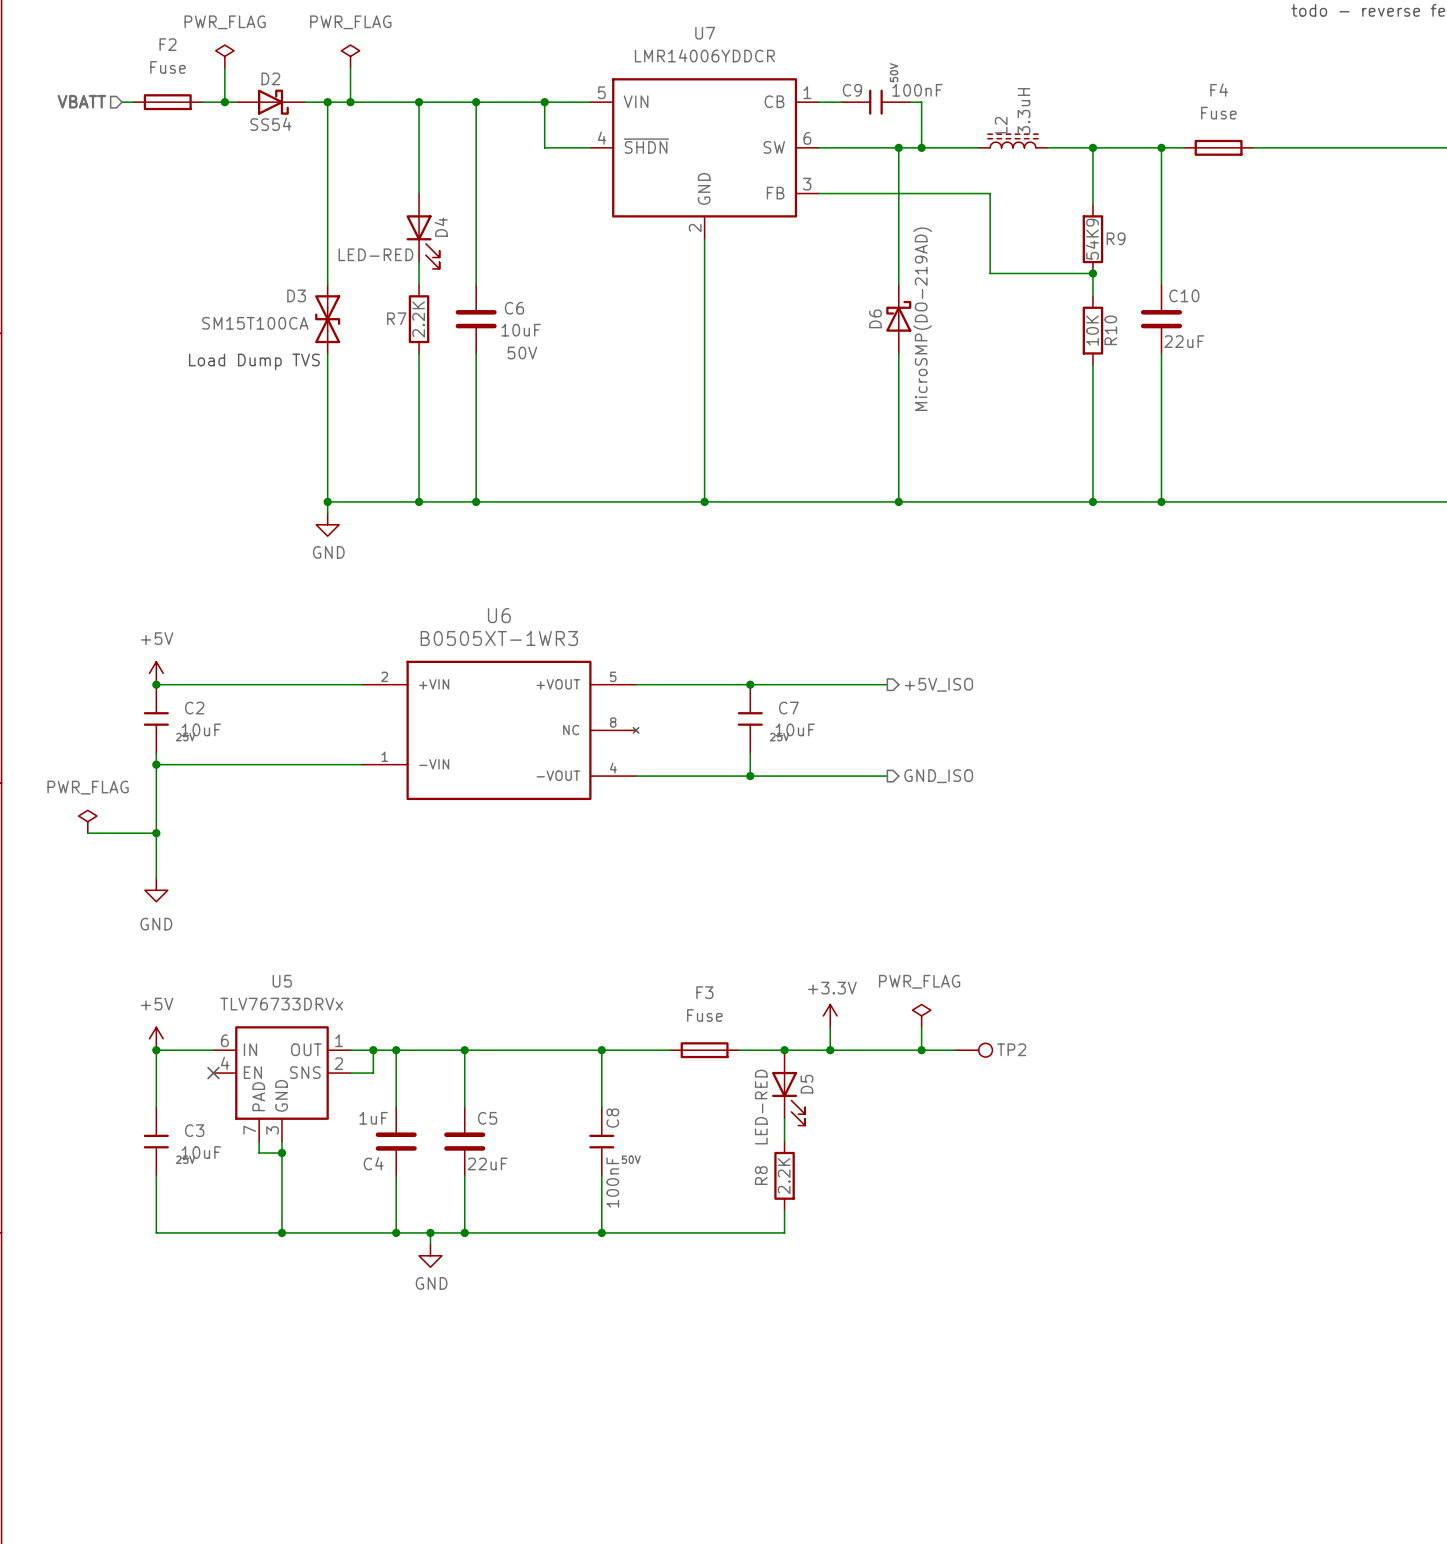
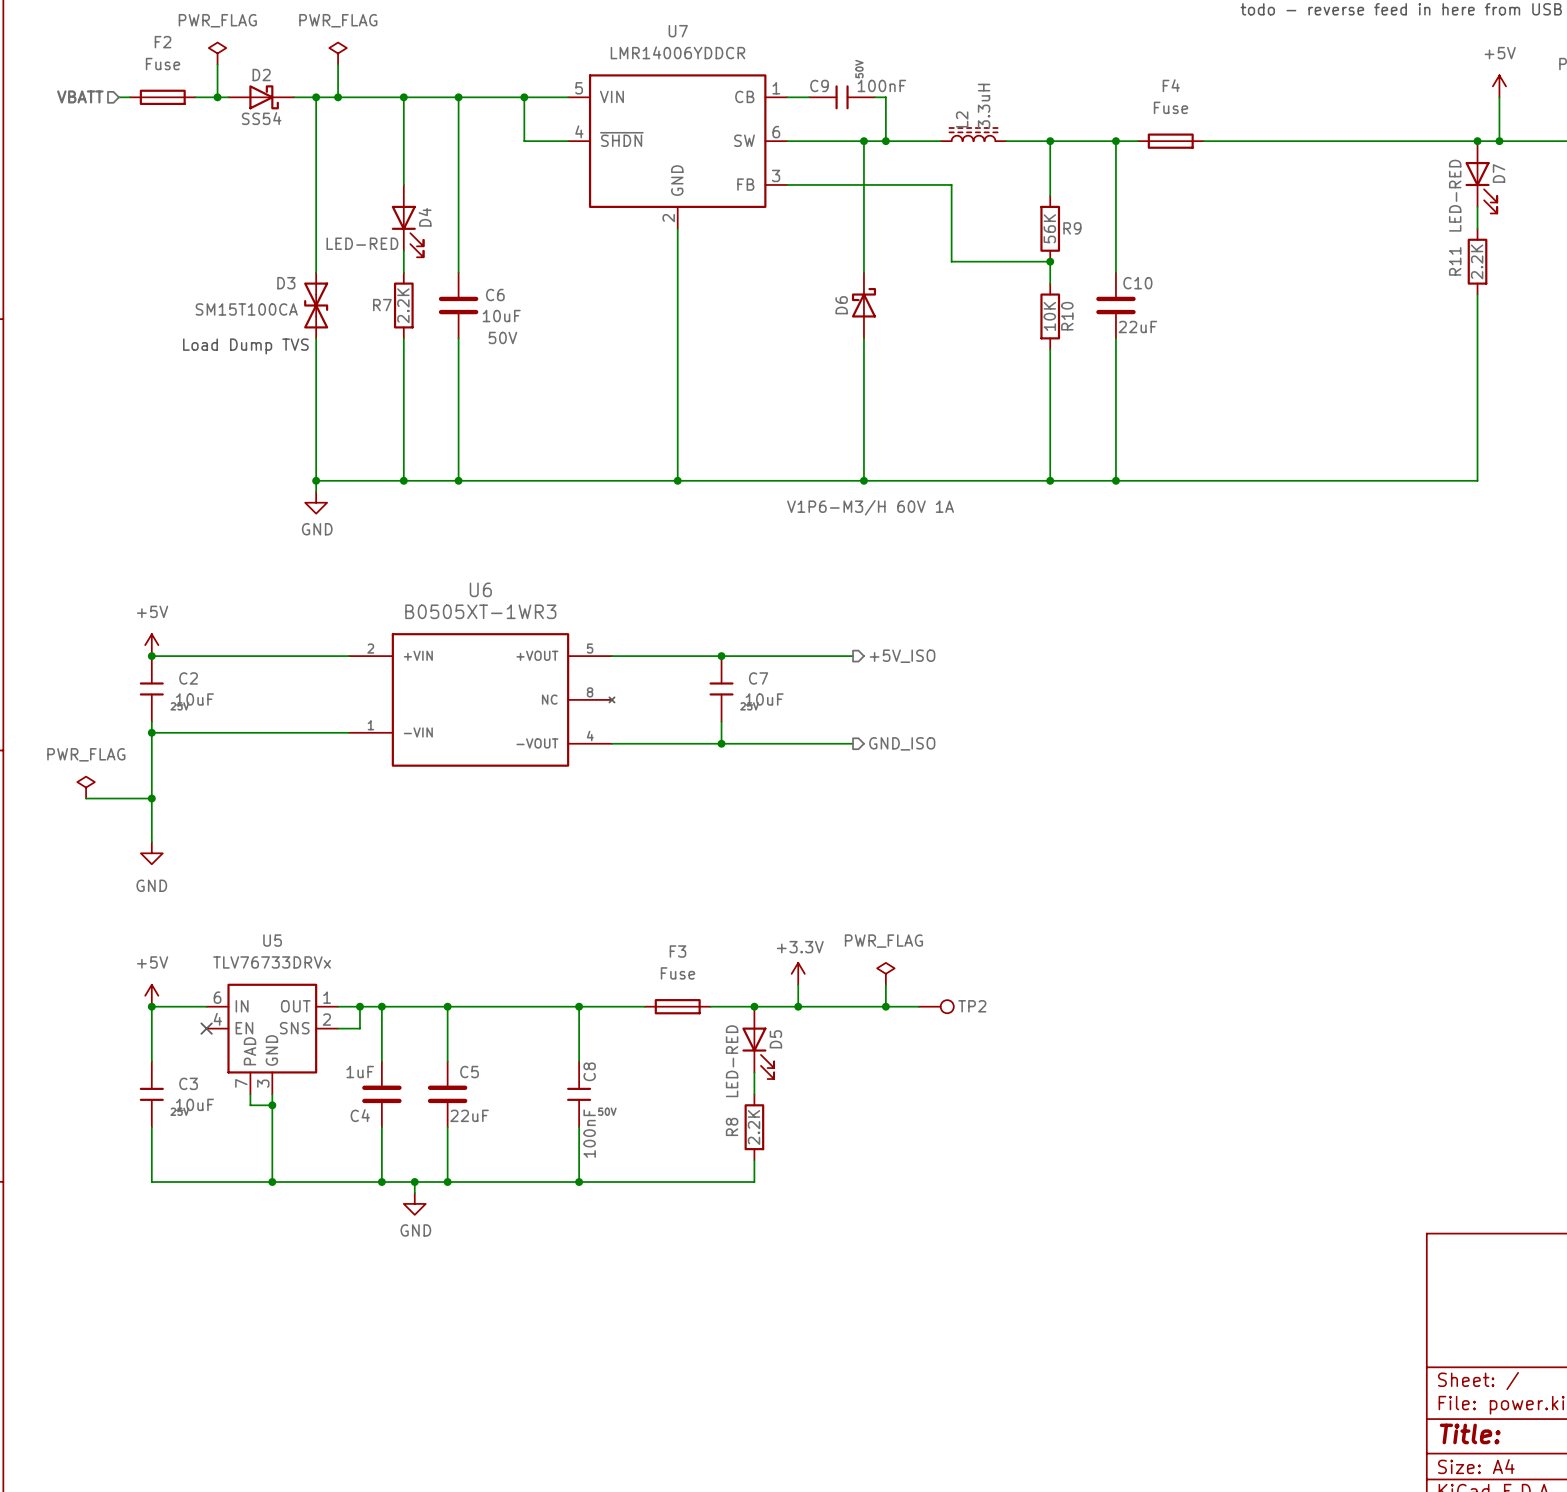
R9 value: 54K9 (1092, 239) -> 56K (1049, 228)
D6 value: MicroSMP(DO-219AD) (922, 319) -> V1P6-M3/H 60V 1A (870, 507)

